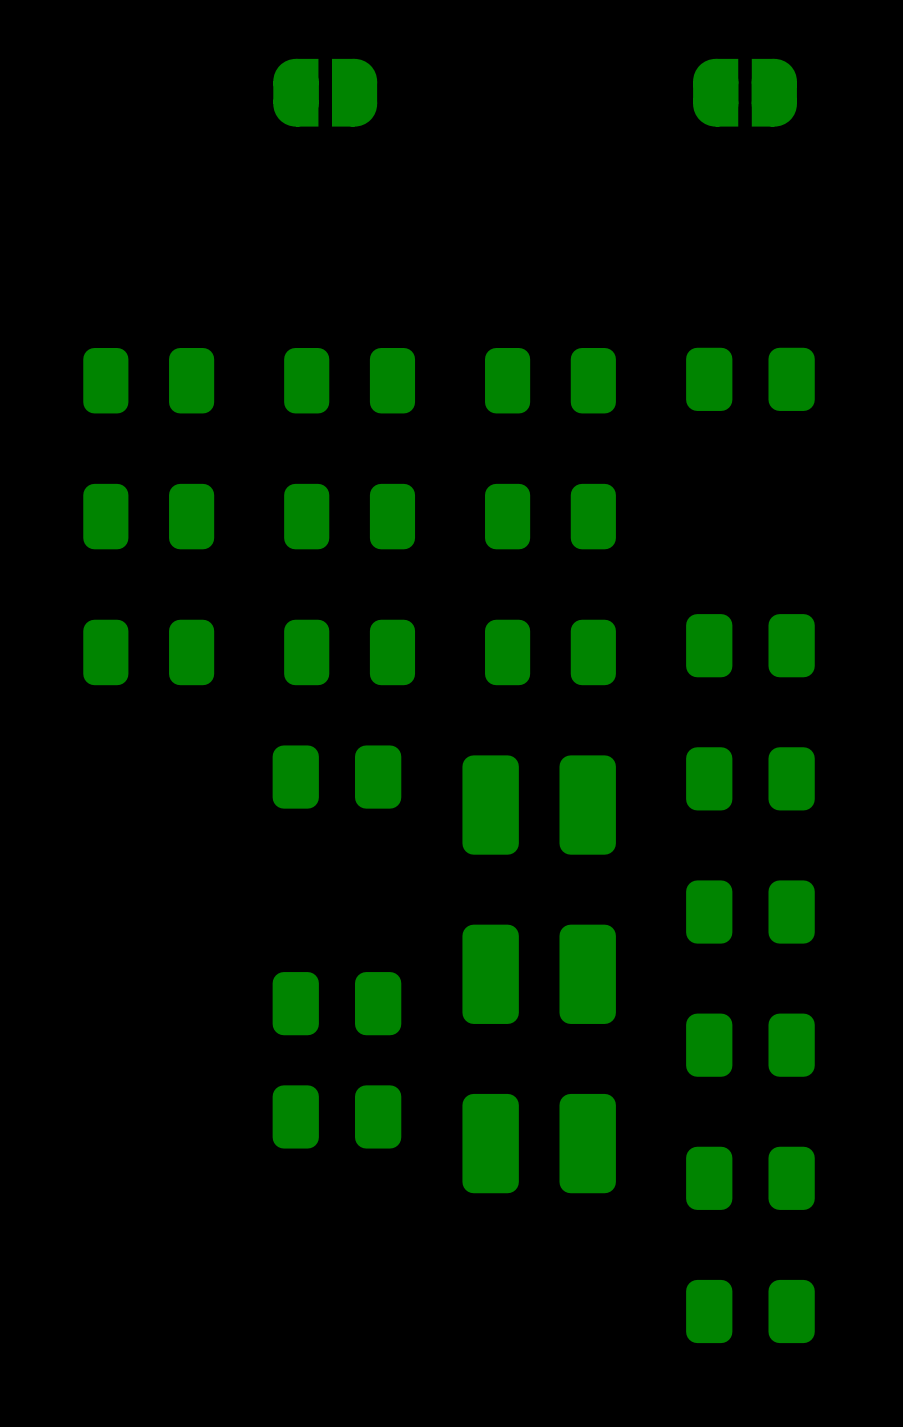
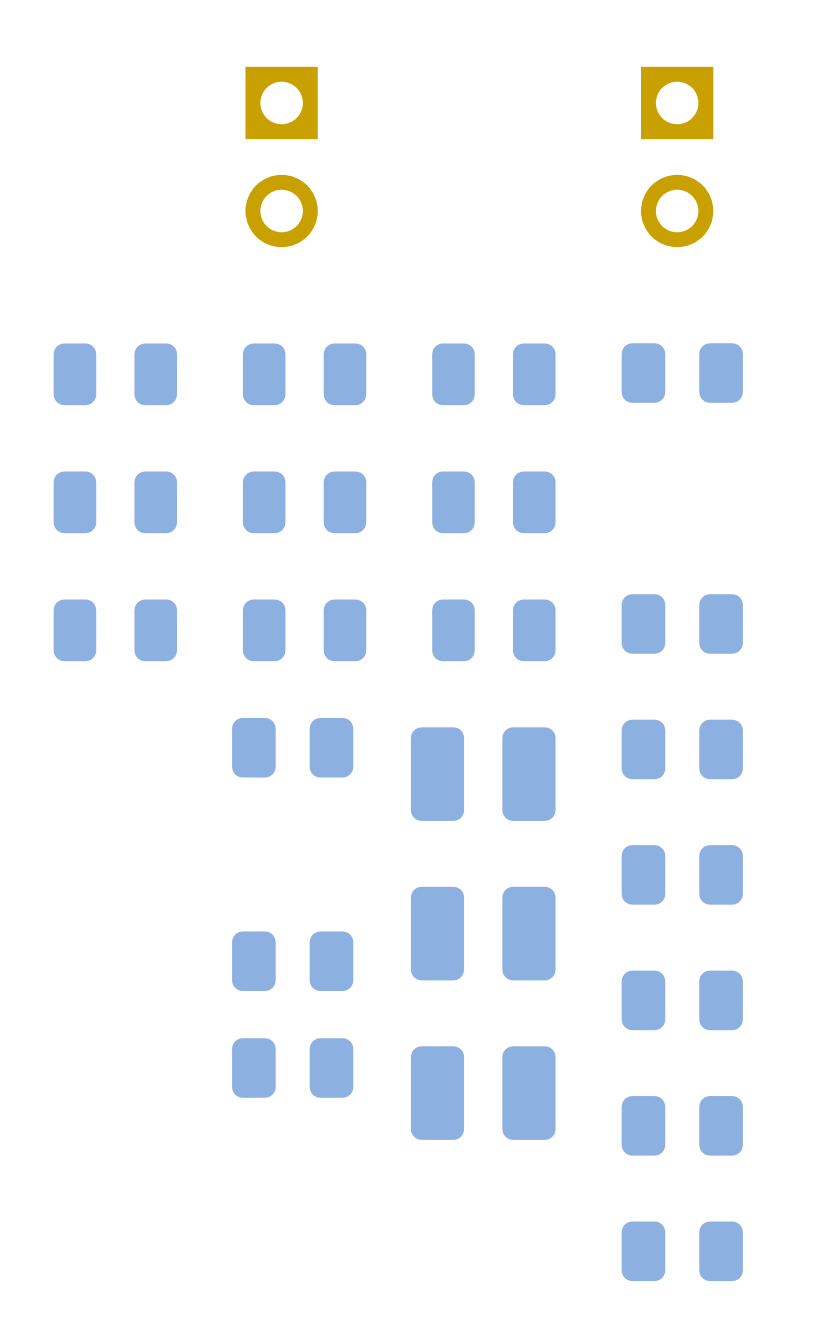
part: (325, 92) -> none
part: (745, 92) -> none
part: none -> (281, 156)
part: none -> (677, 156)

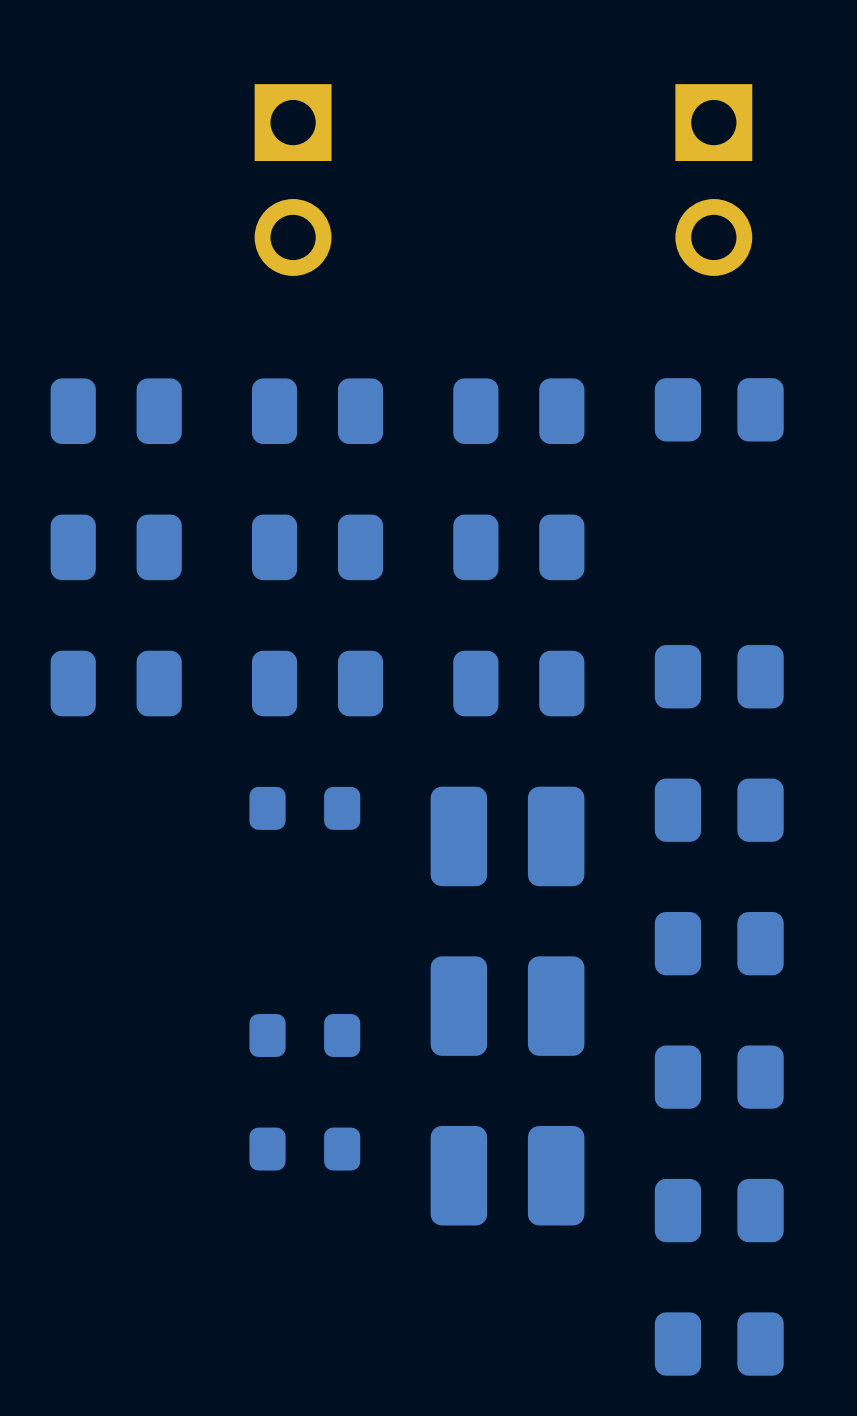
part footprint: [232, 717, 354, 778] -> [249, 786, 361, 830]
part footprint: [232, 931, 354, 992] -> [249, 1014, 361, 1057]
part footprint: [232, 1038, 354, 1098] -> [249, 1127, 361, 1171]

